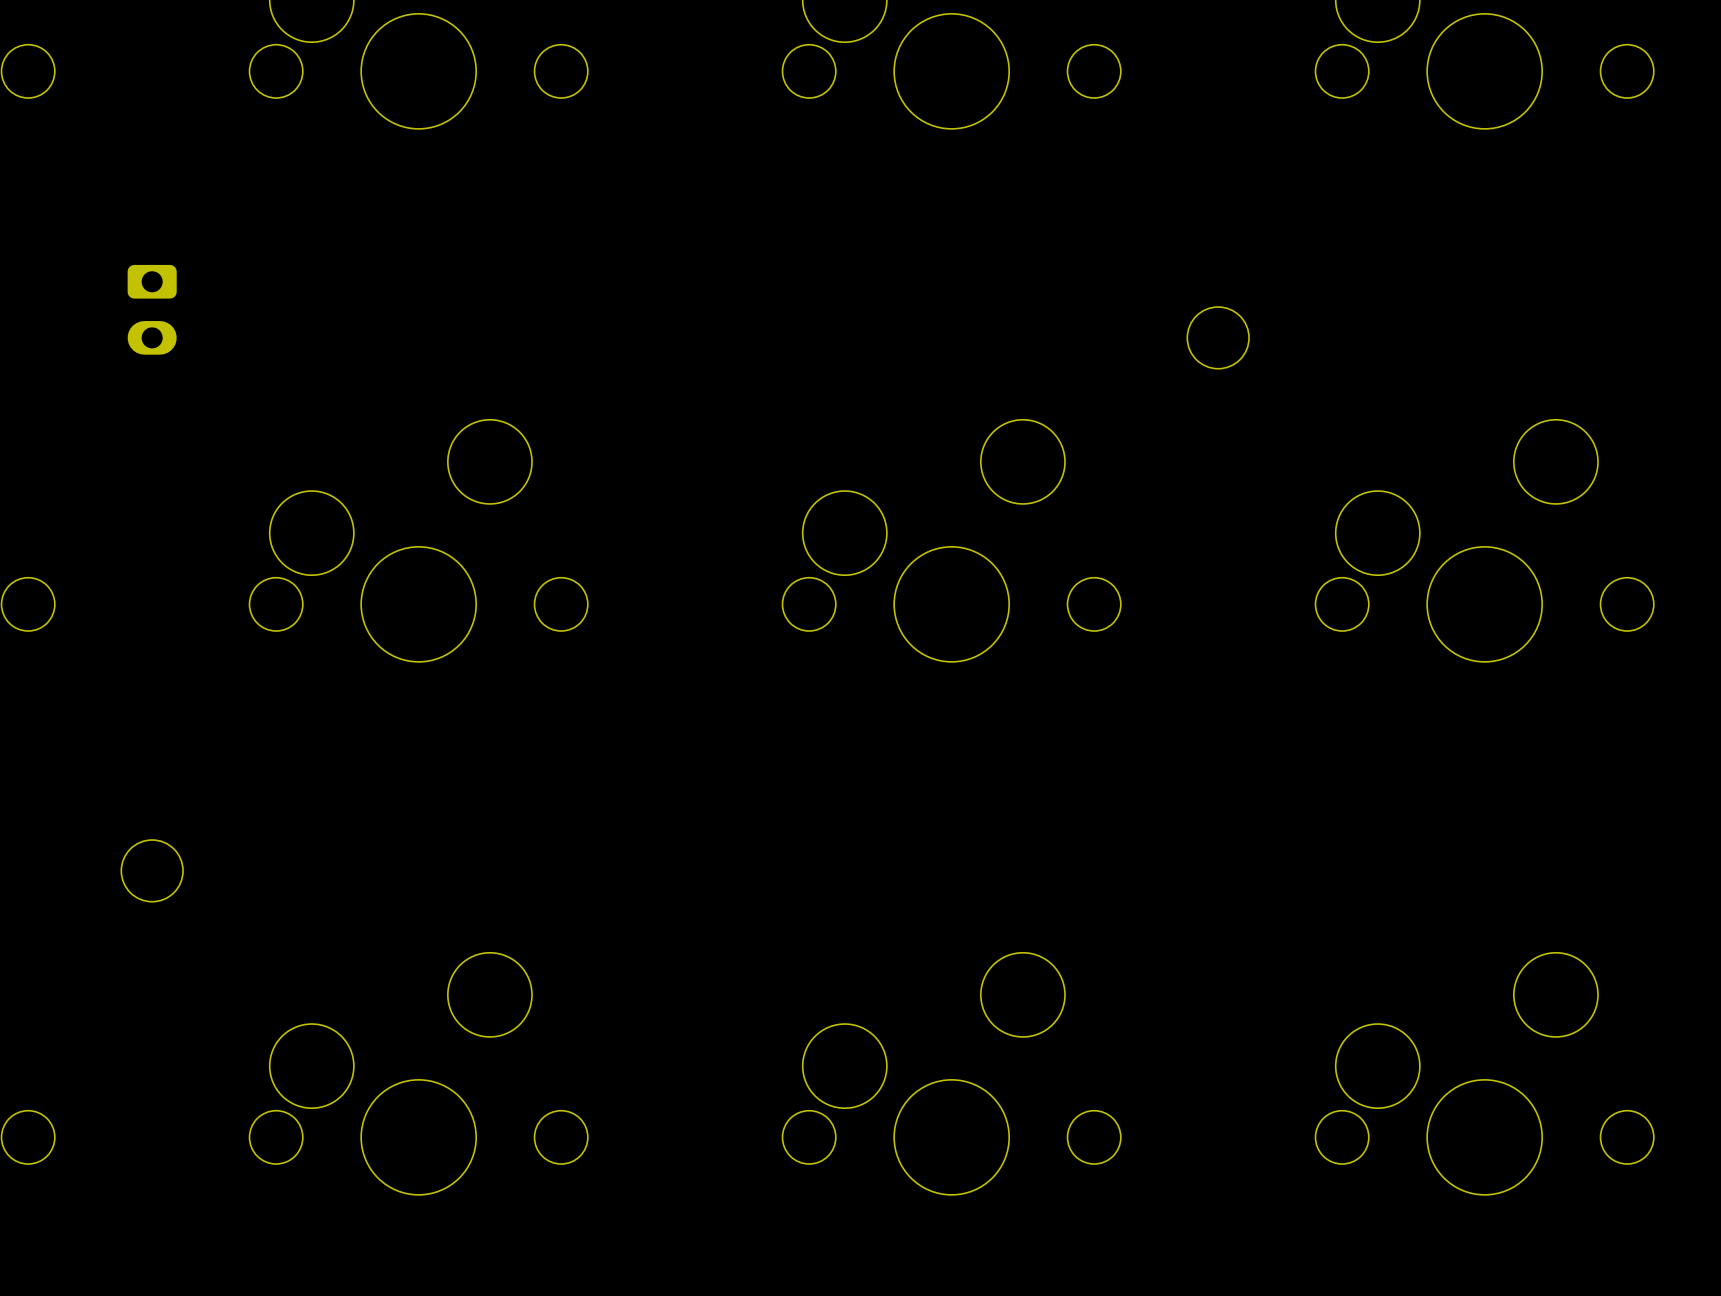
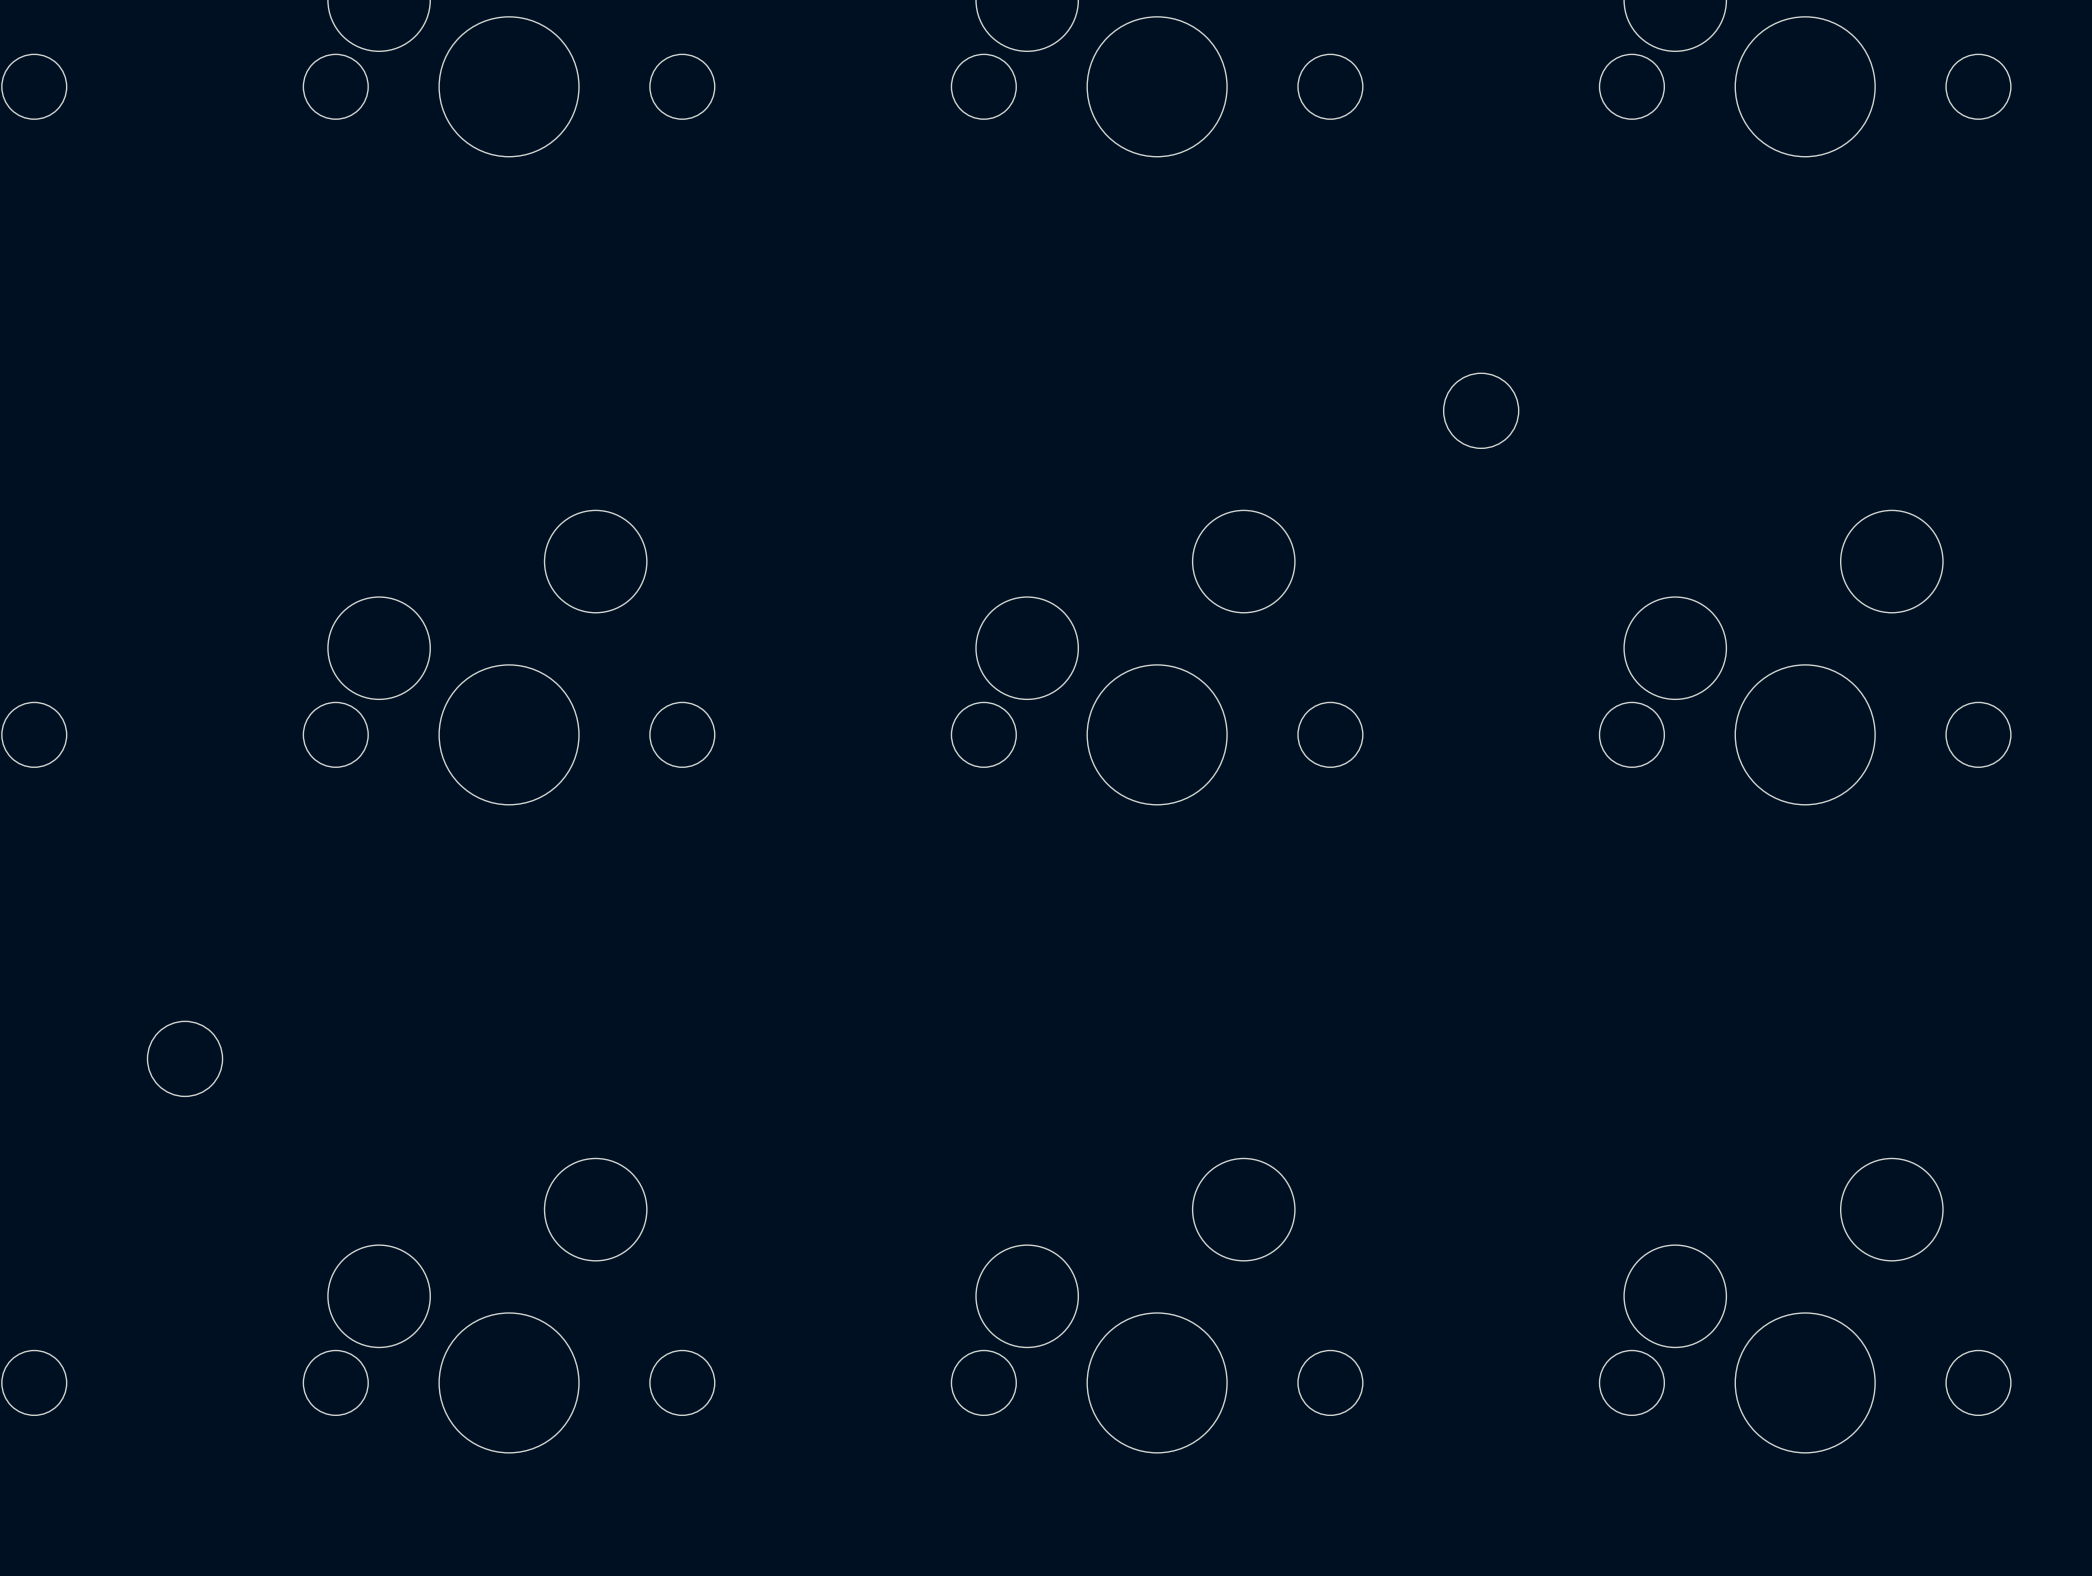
part: (152, 309) -> none

